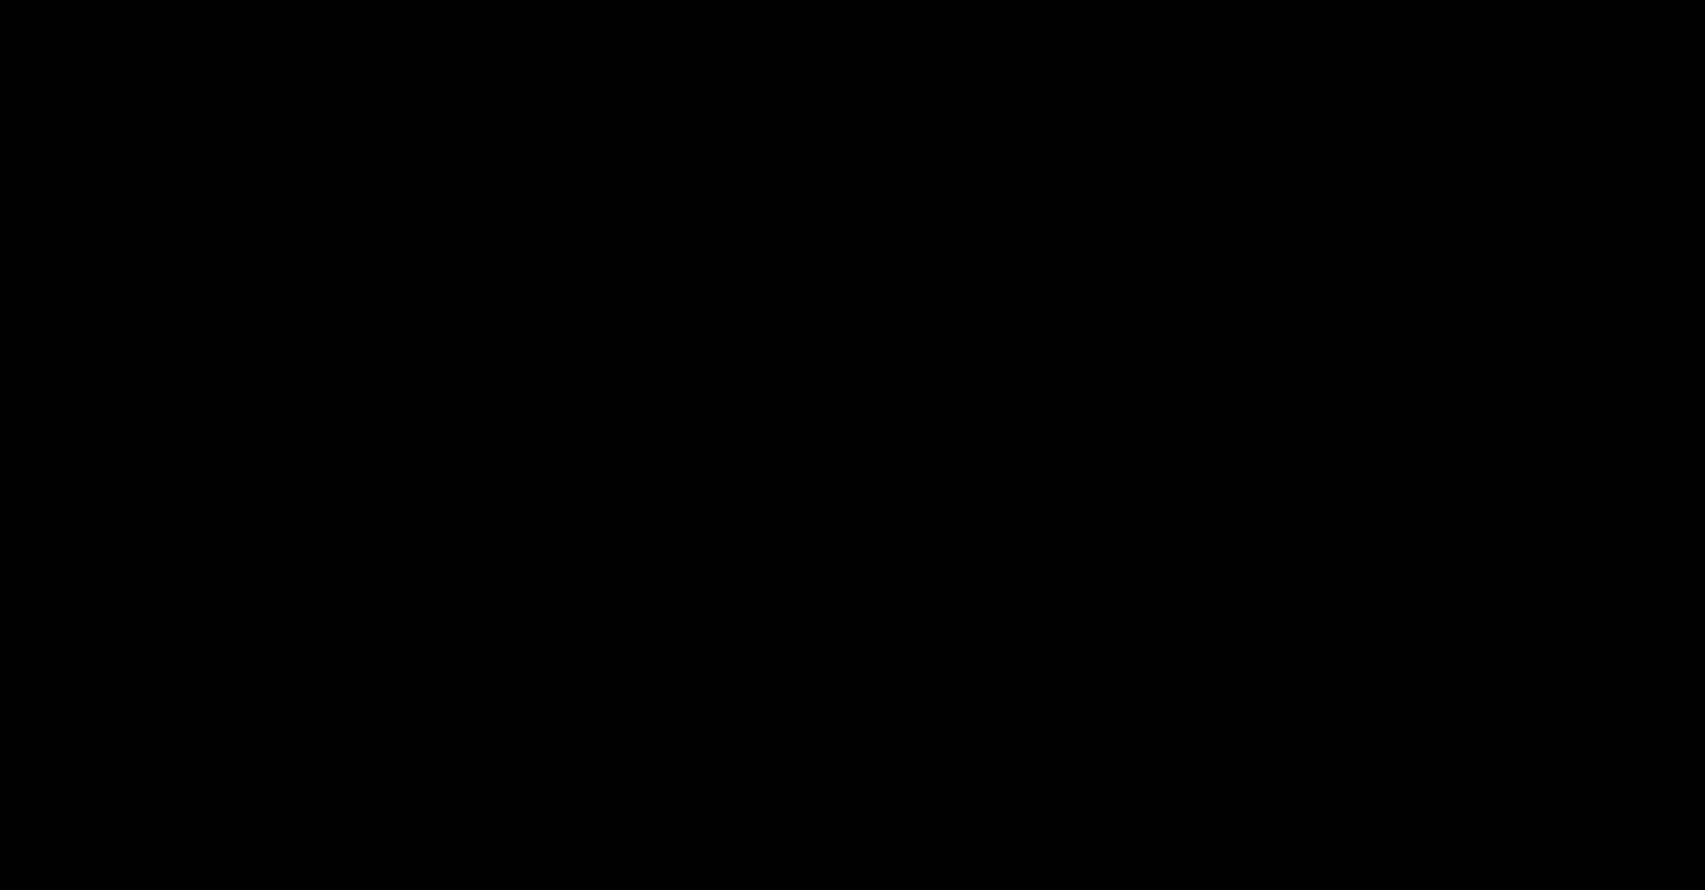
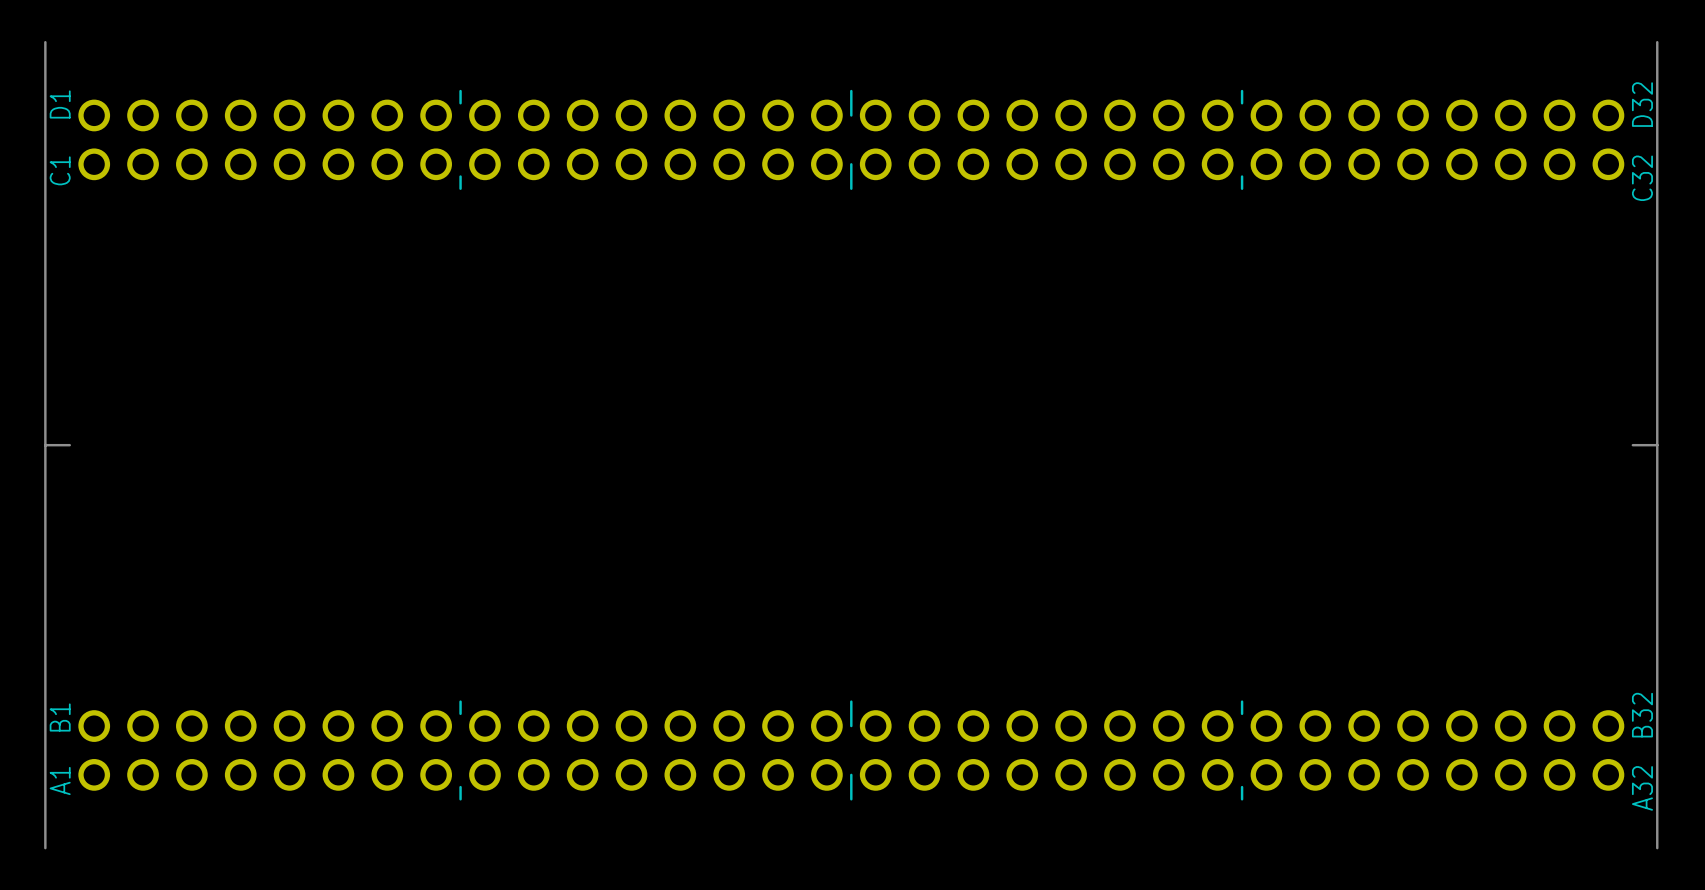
part: none -> (851, 445)

